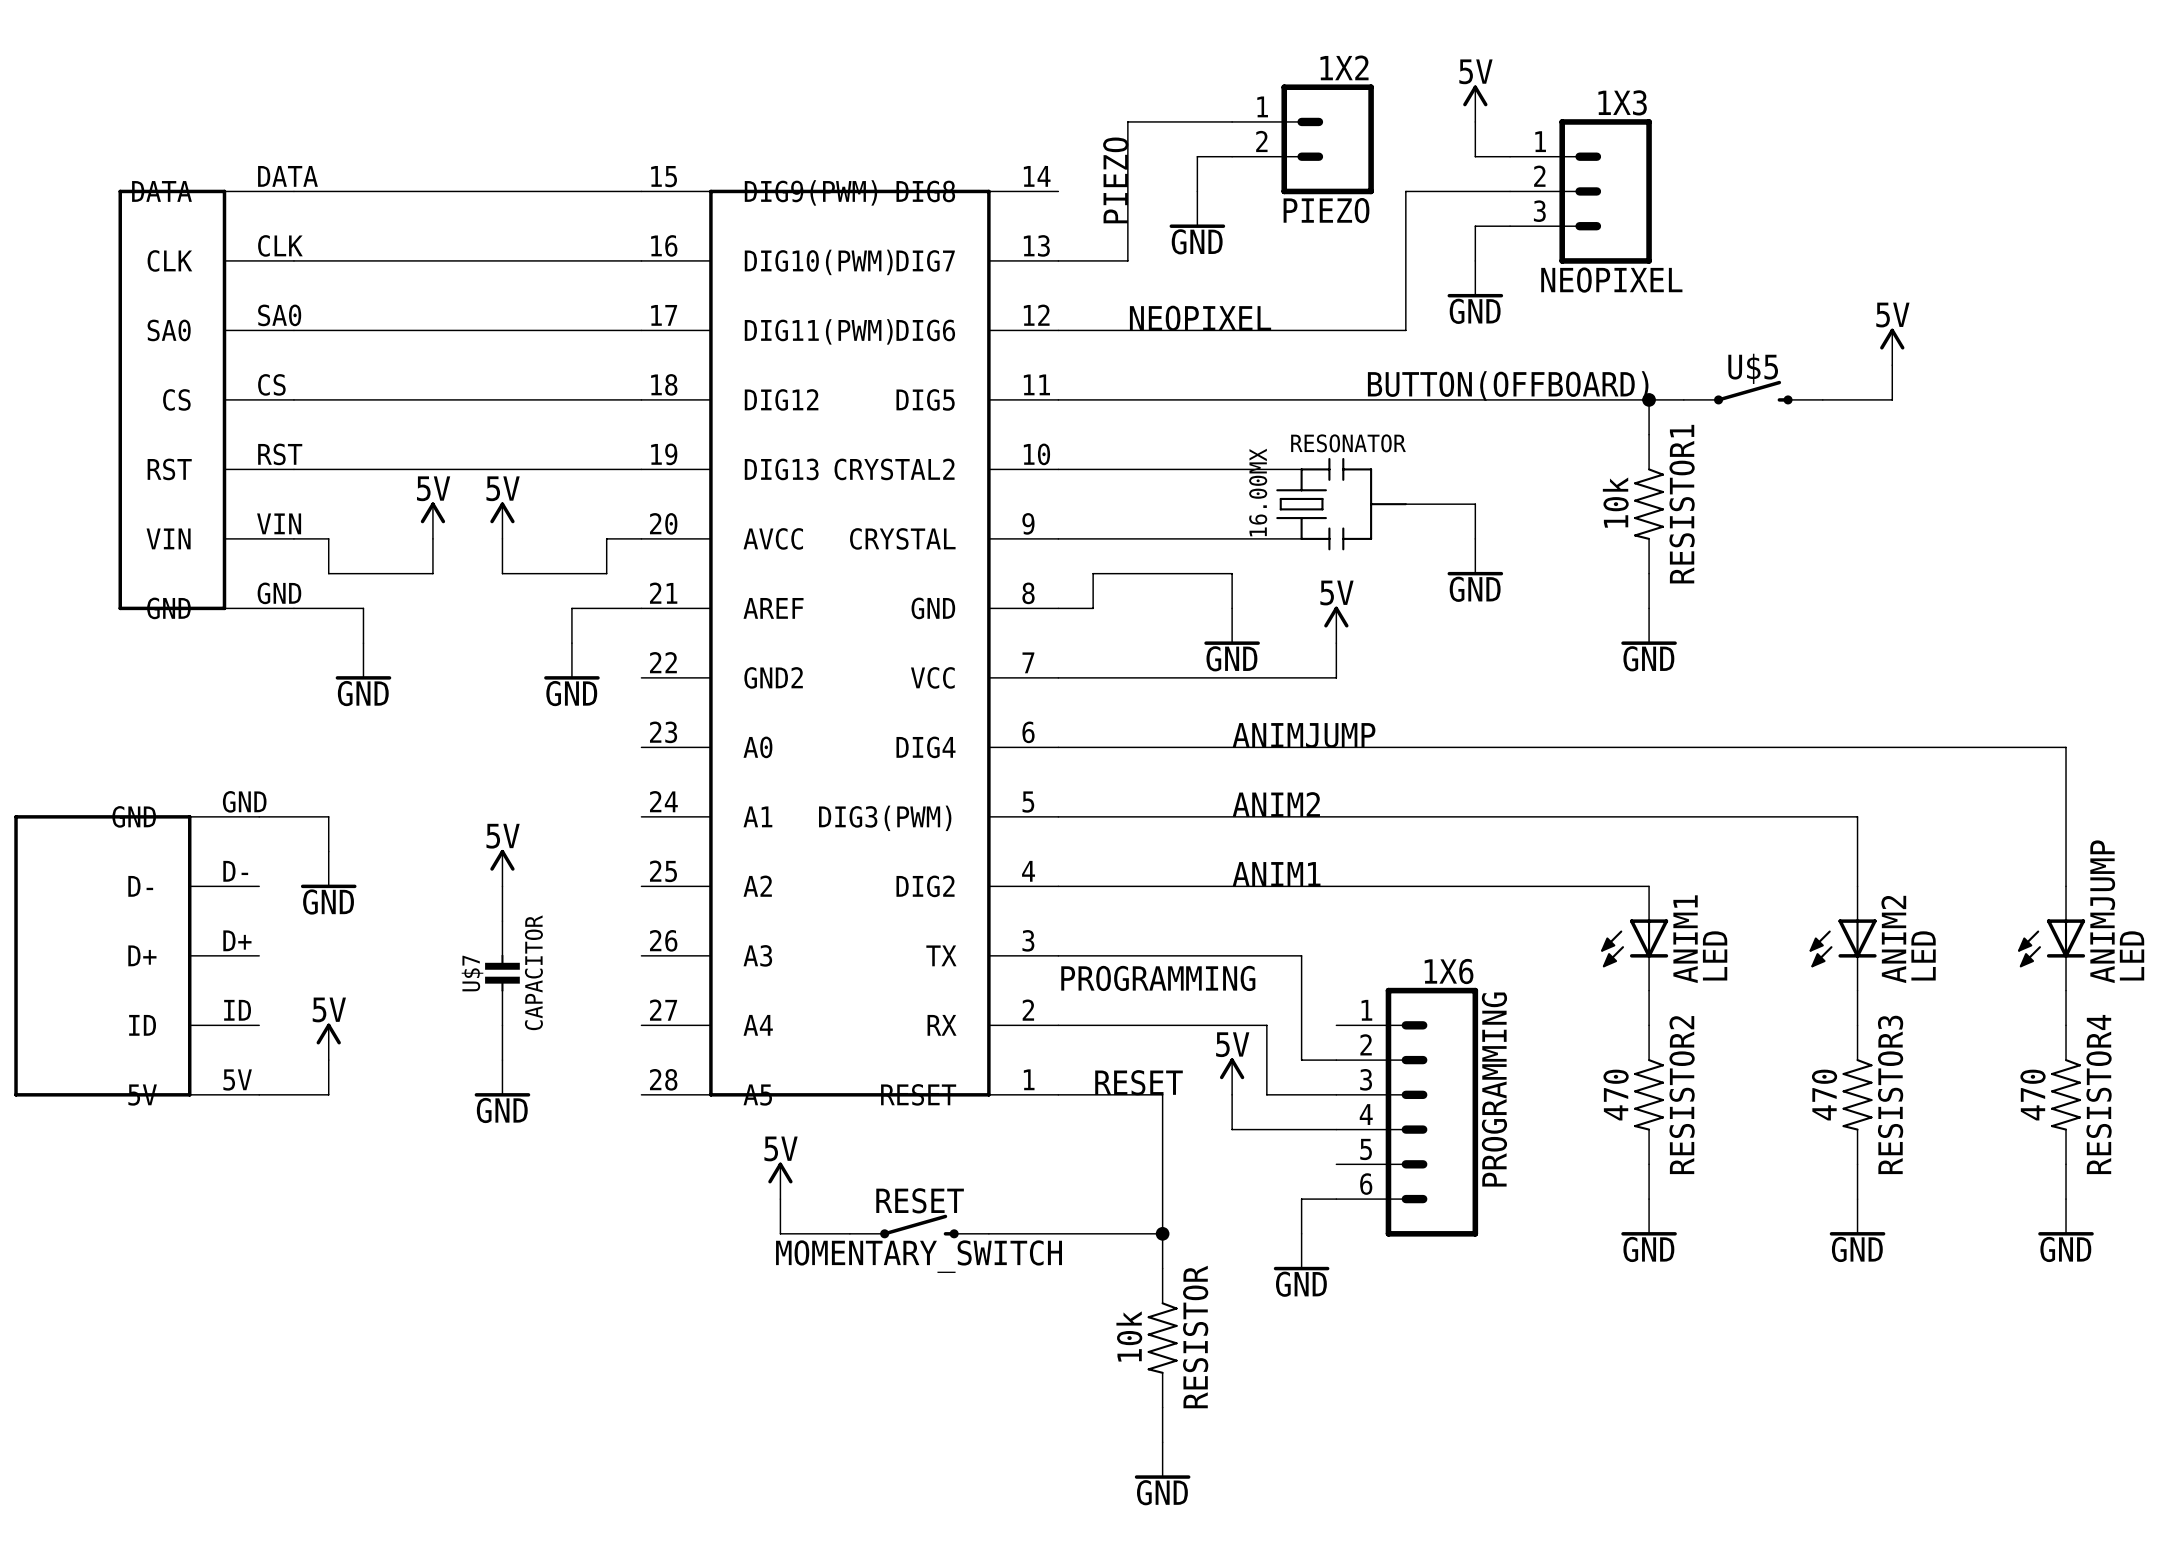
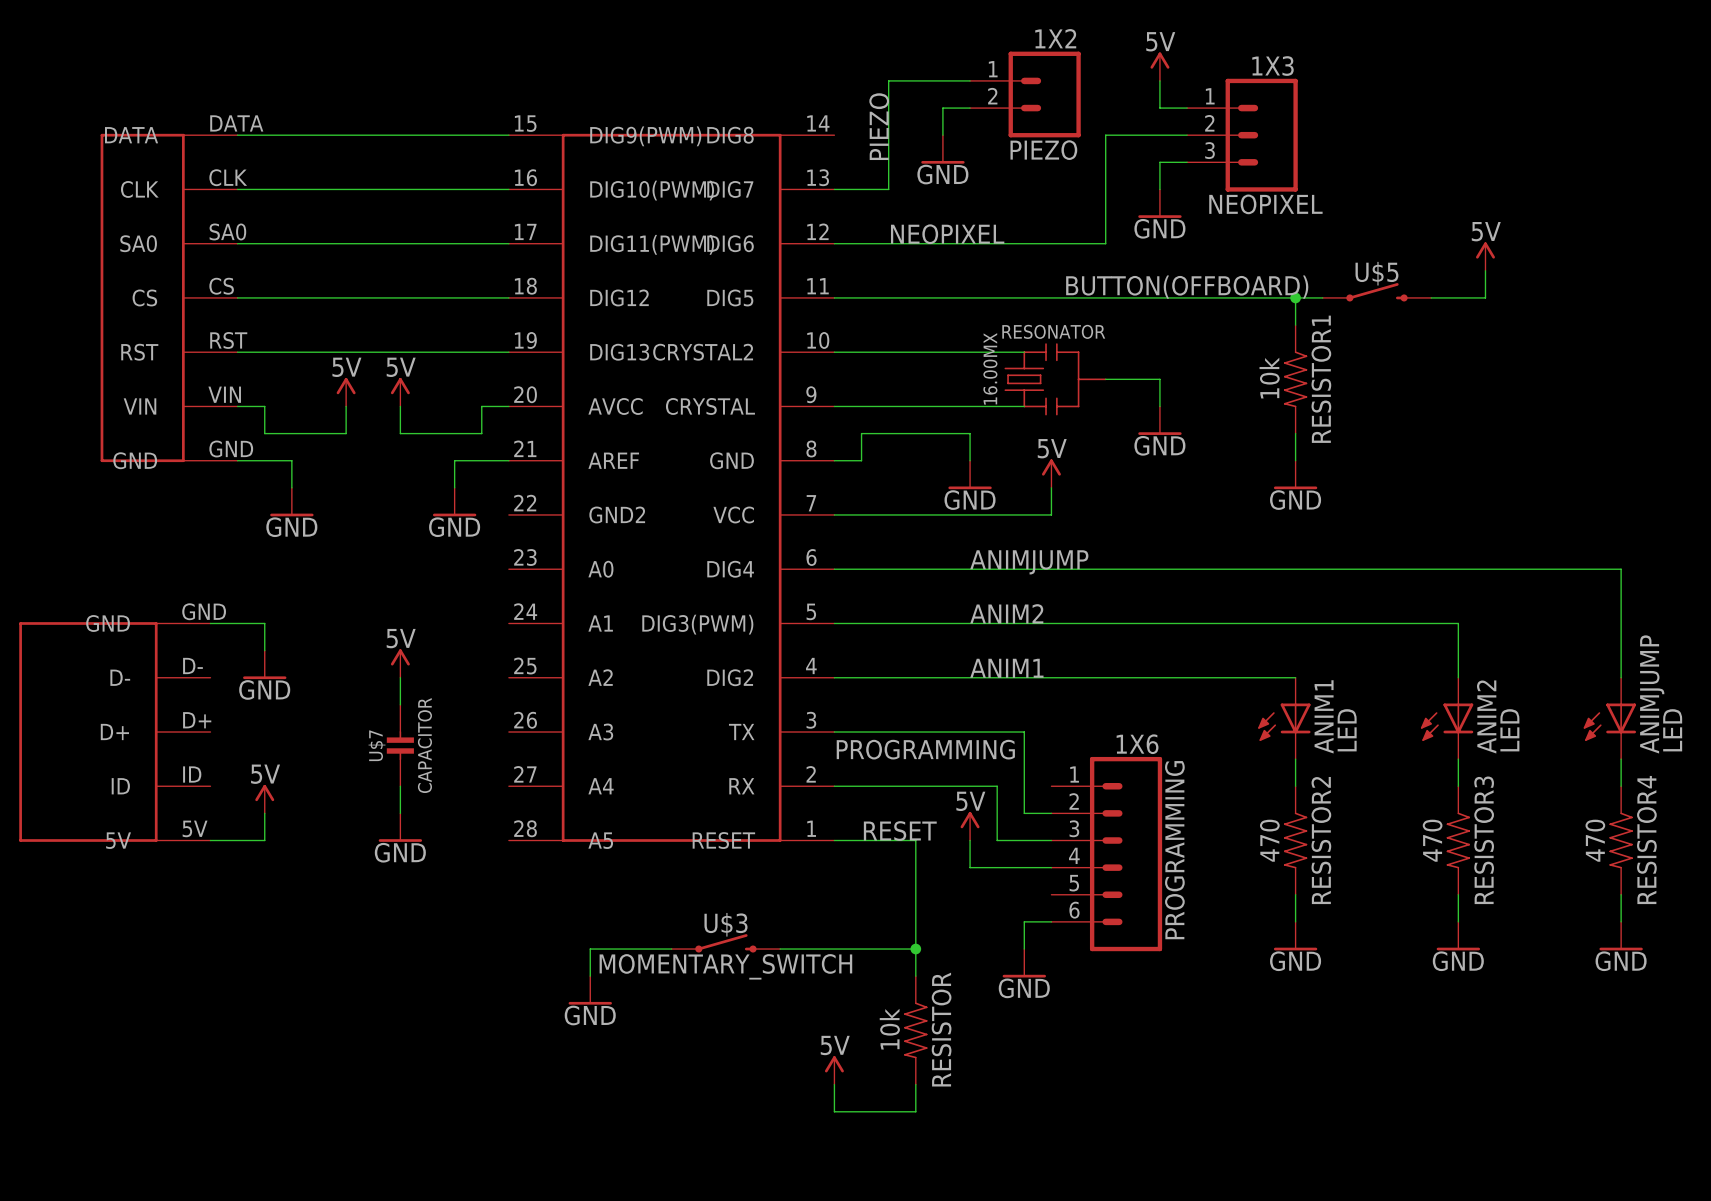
power symbol: 5V (780, 1180) -> none
wire: (780, 1199) (780, 1233) -> (590, 976) (590, 949) (617, 949)
RESET name: RESET (920, 1200) -> U$3 (725, 924)
power symbol: none -> GND (590, 990)
power symbol: none -> 5V (834, 1070)
wire: none -> (834, 1084) (834, 1111) (915, 1111)
power symbol: GND (1162, 1460) -> none

